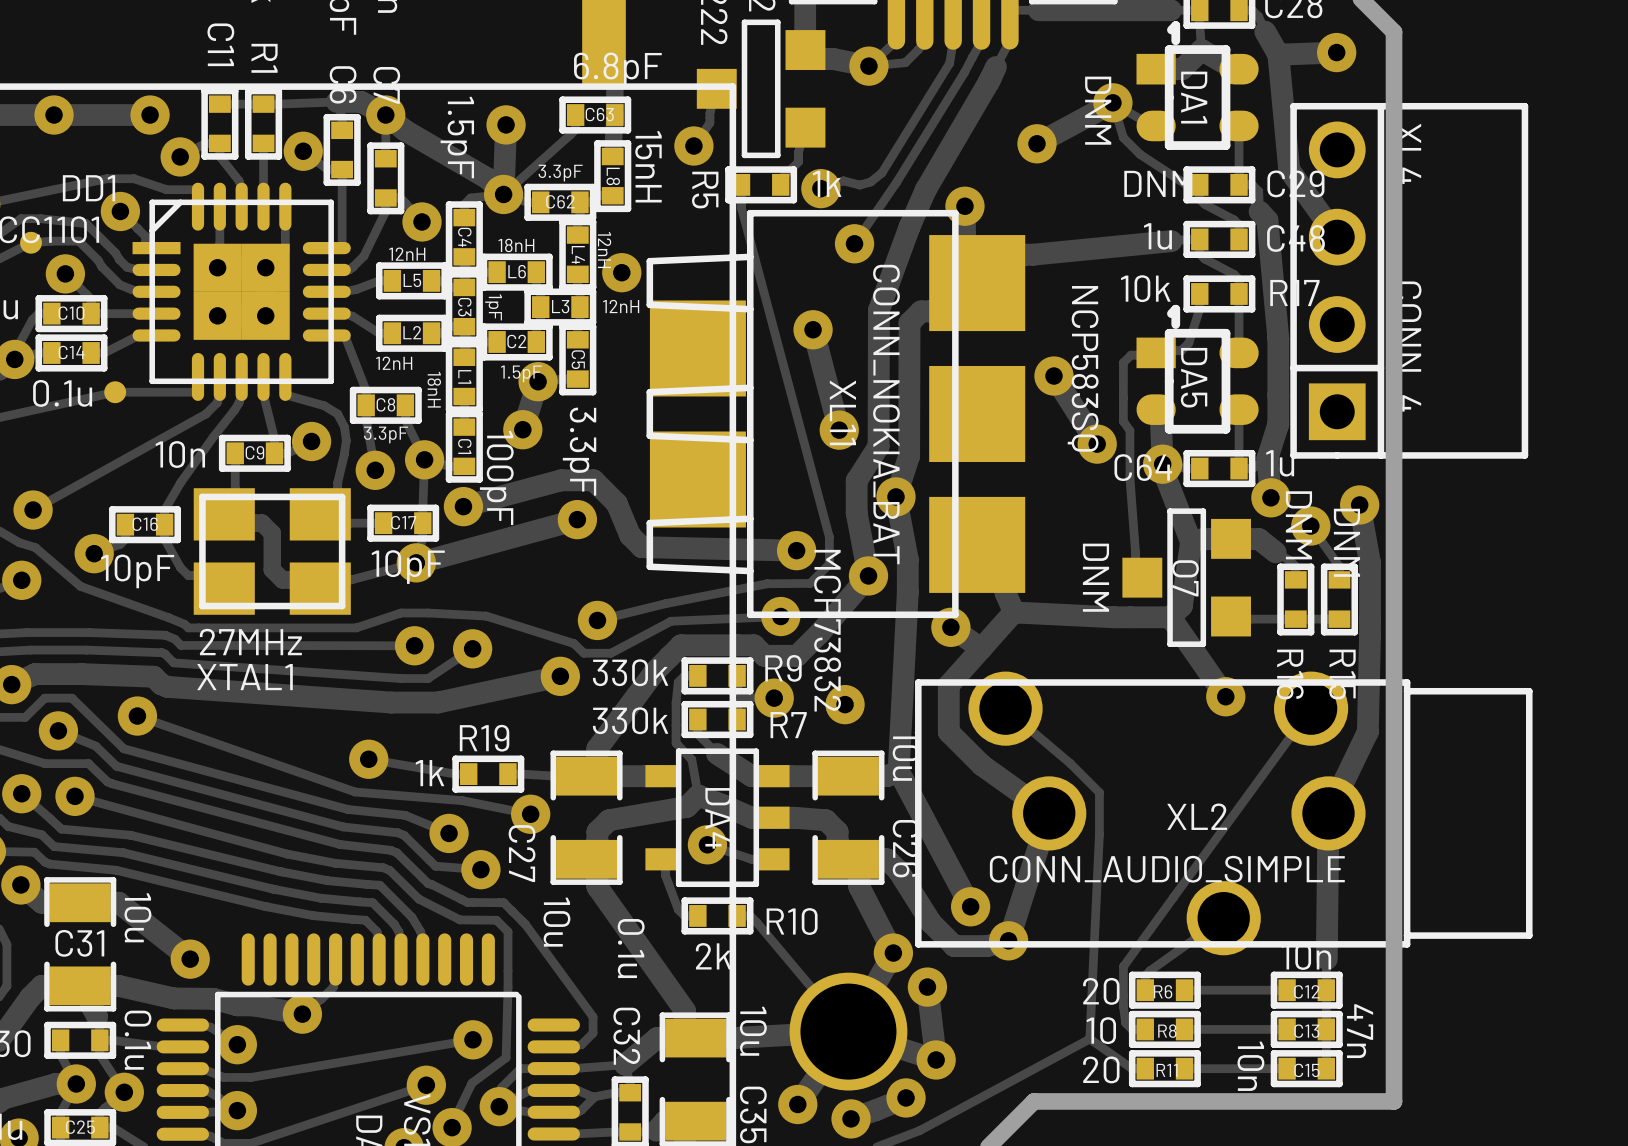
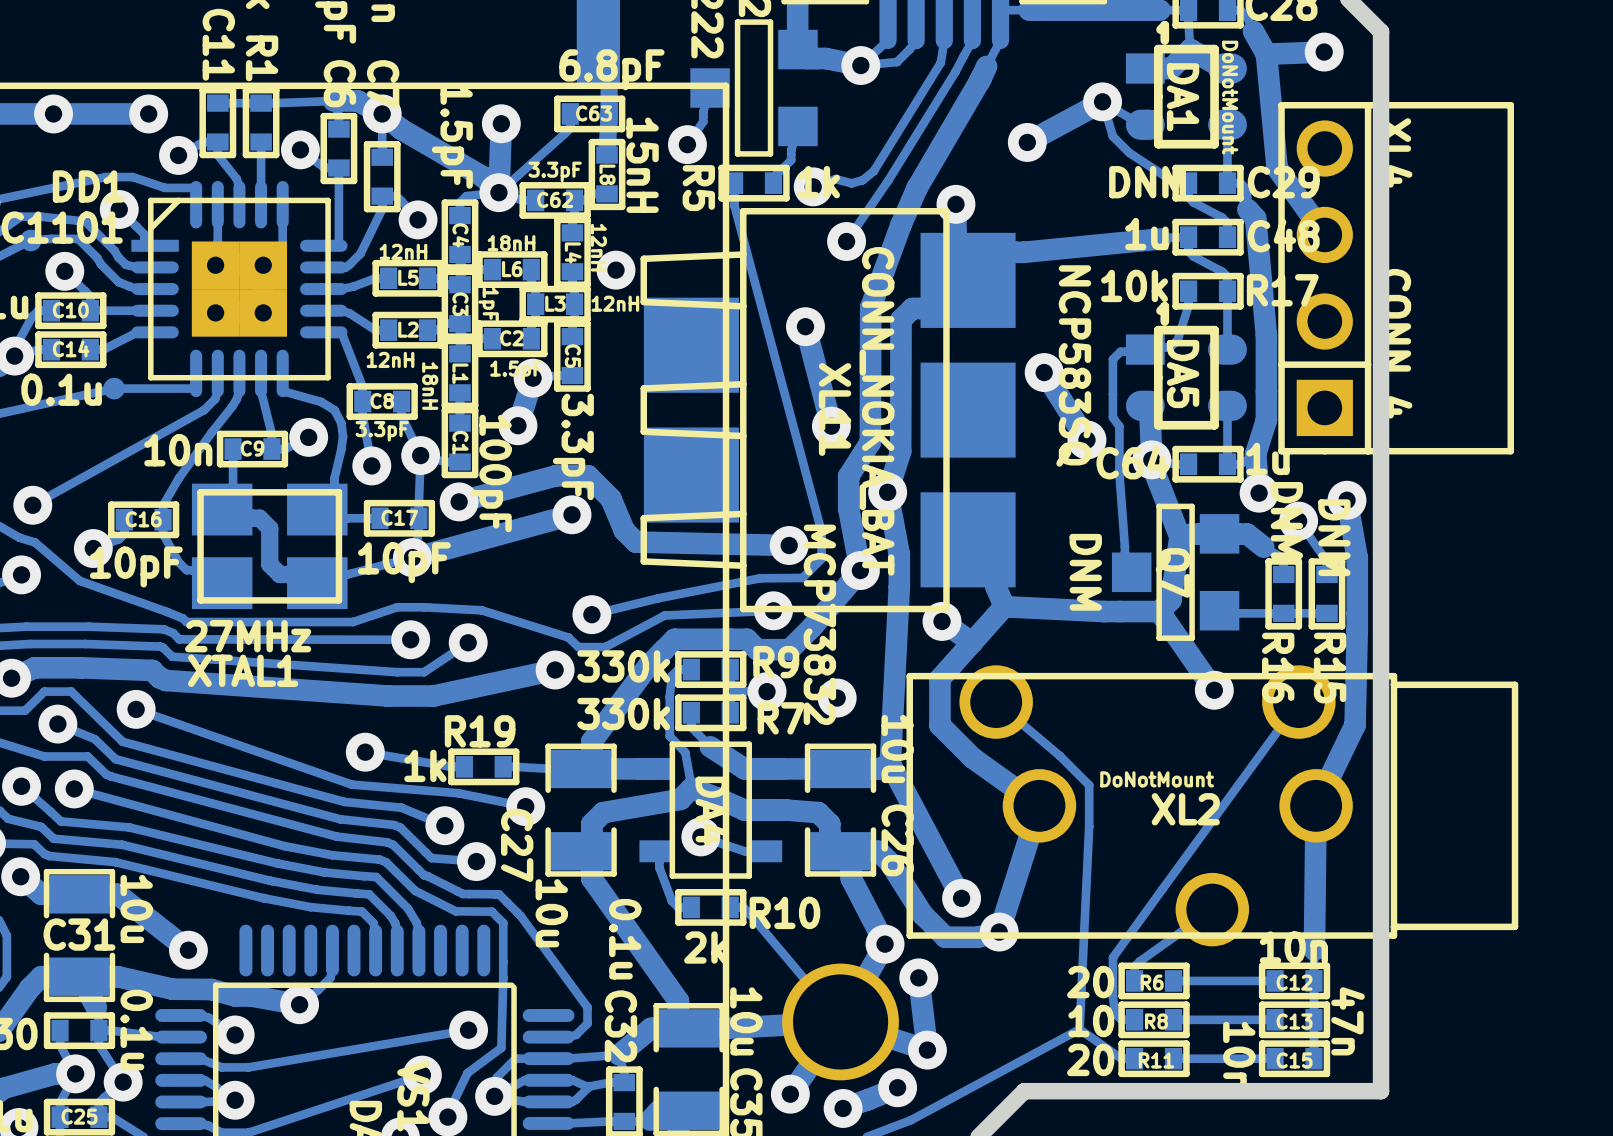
DA1 value: DNM (1098, 110) -> DoNotMount (1230, 97)
XL2 value: CONN_AUDIO_SIMPLE (1167, 869) -> DoNotMount (1157, 779)

